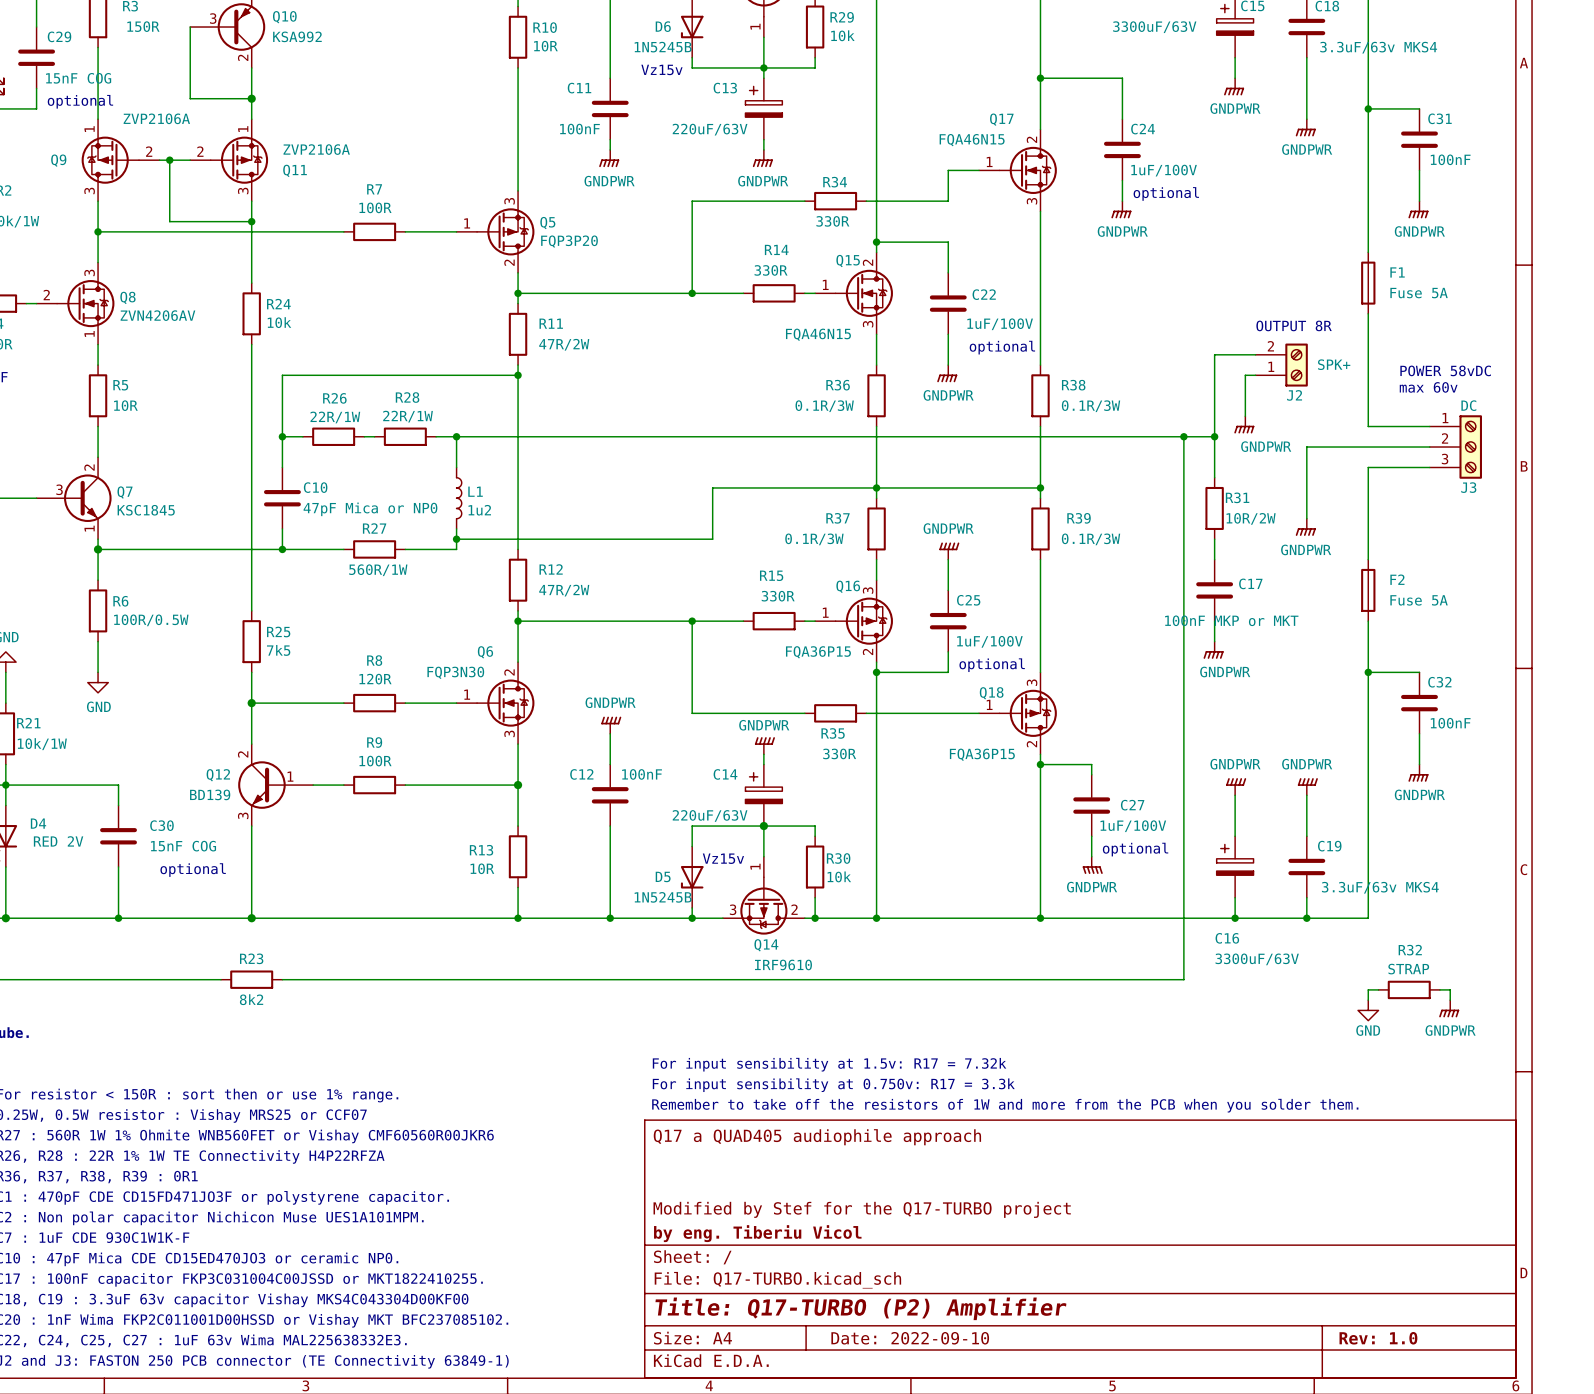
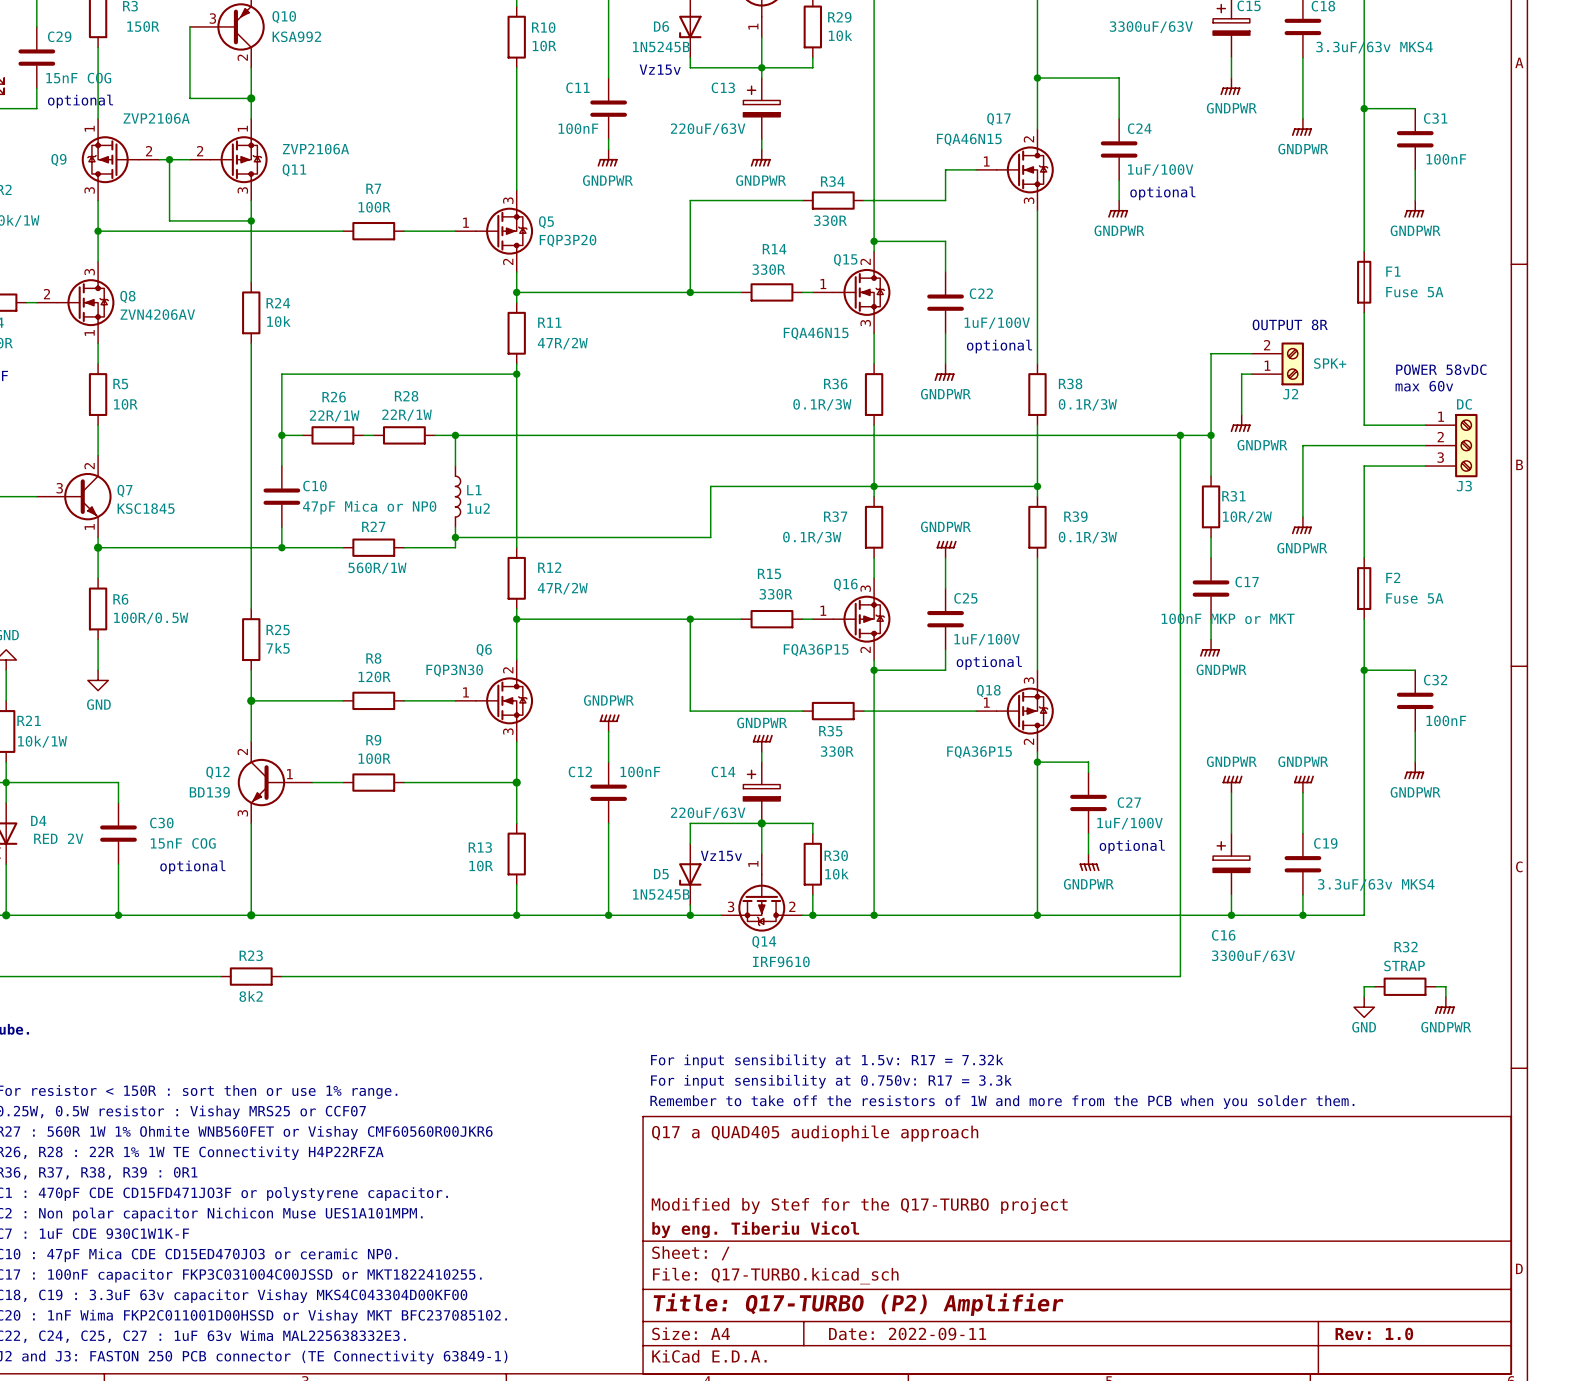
title block: Date: 2022-09-10 (910, 1338) -> Date: 2022-09-11 (907, 1333)

